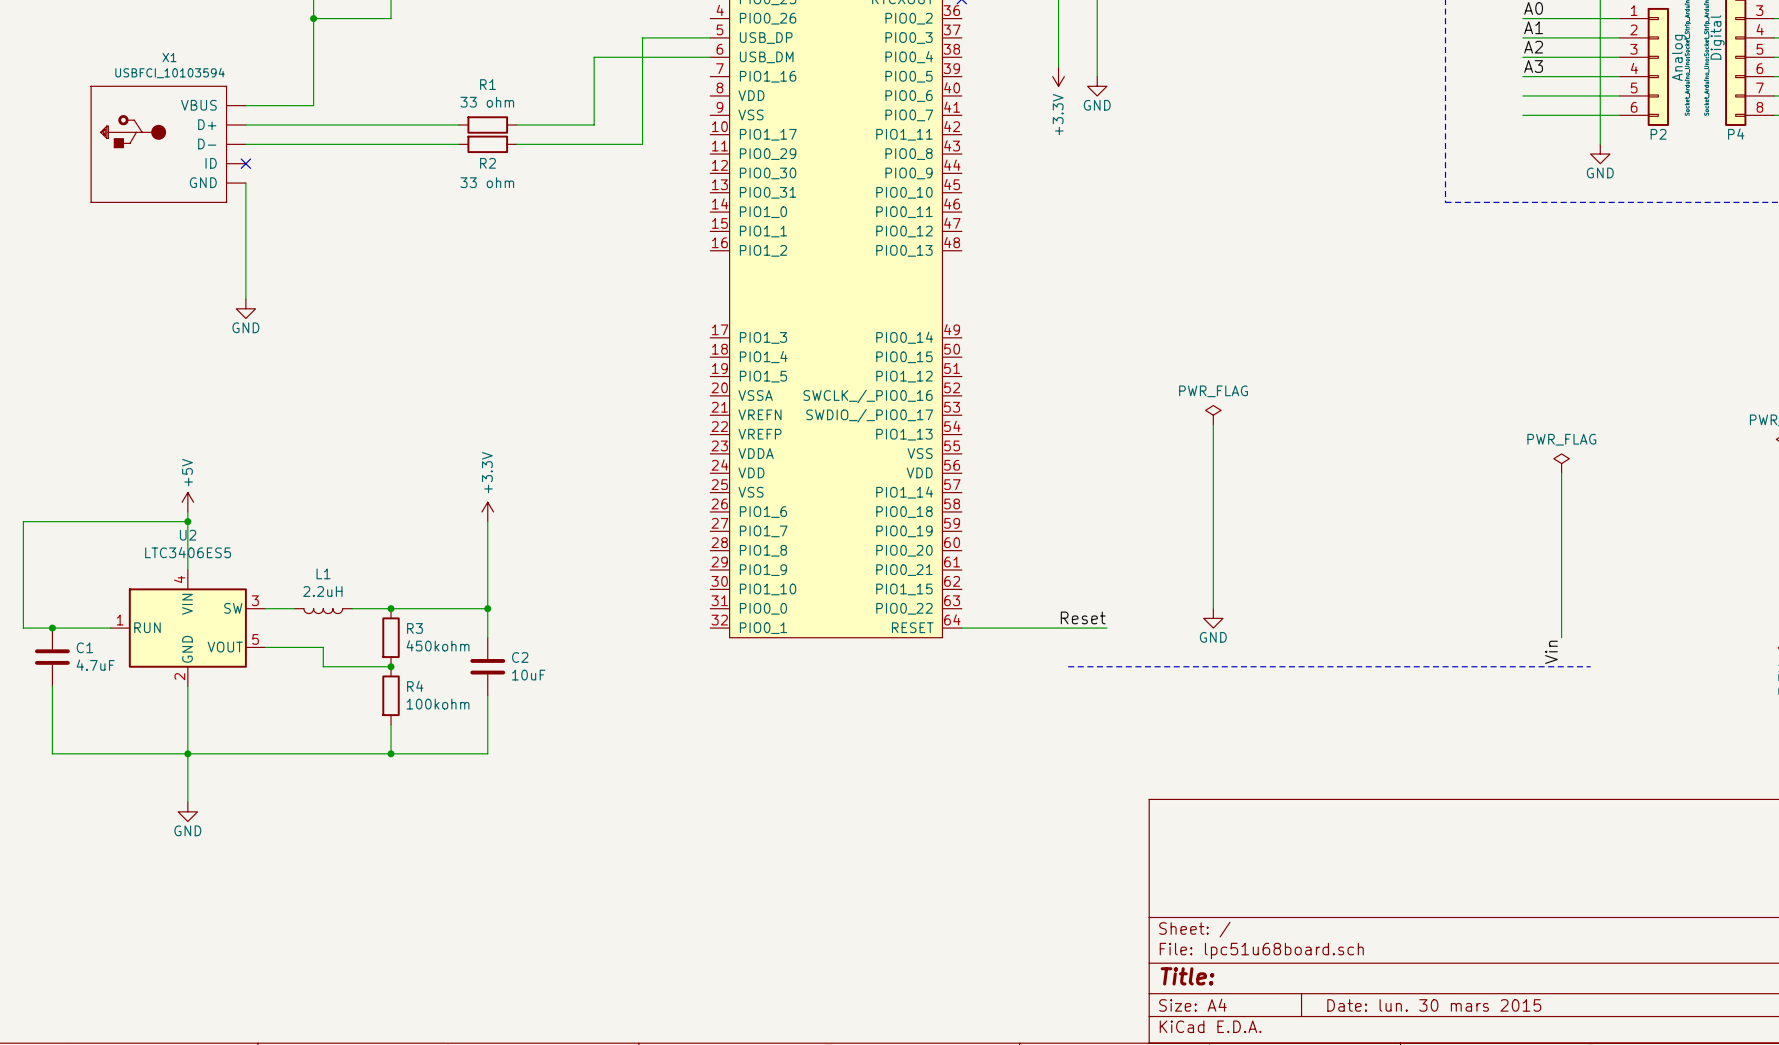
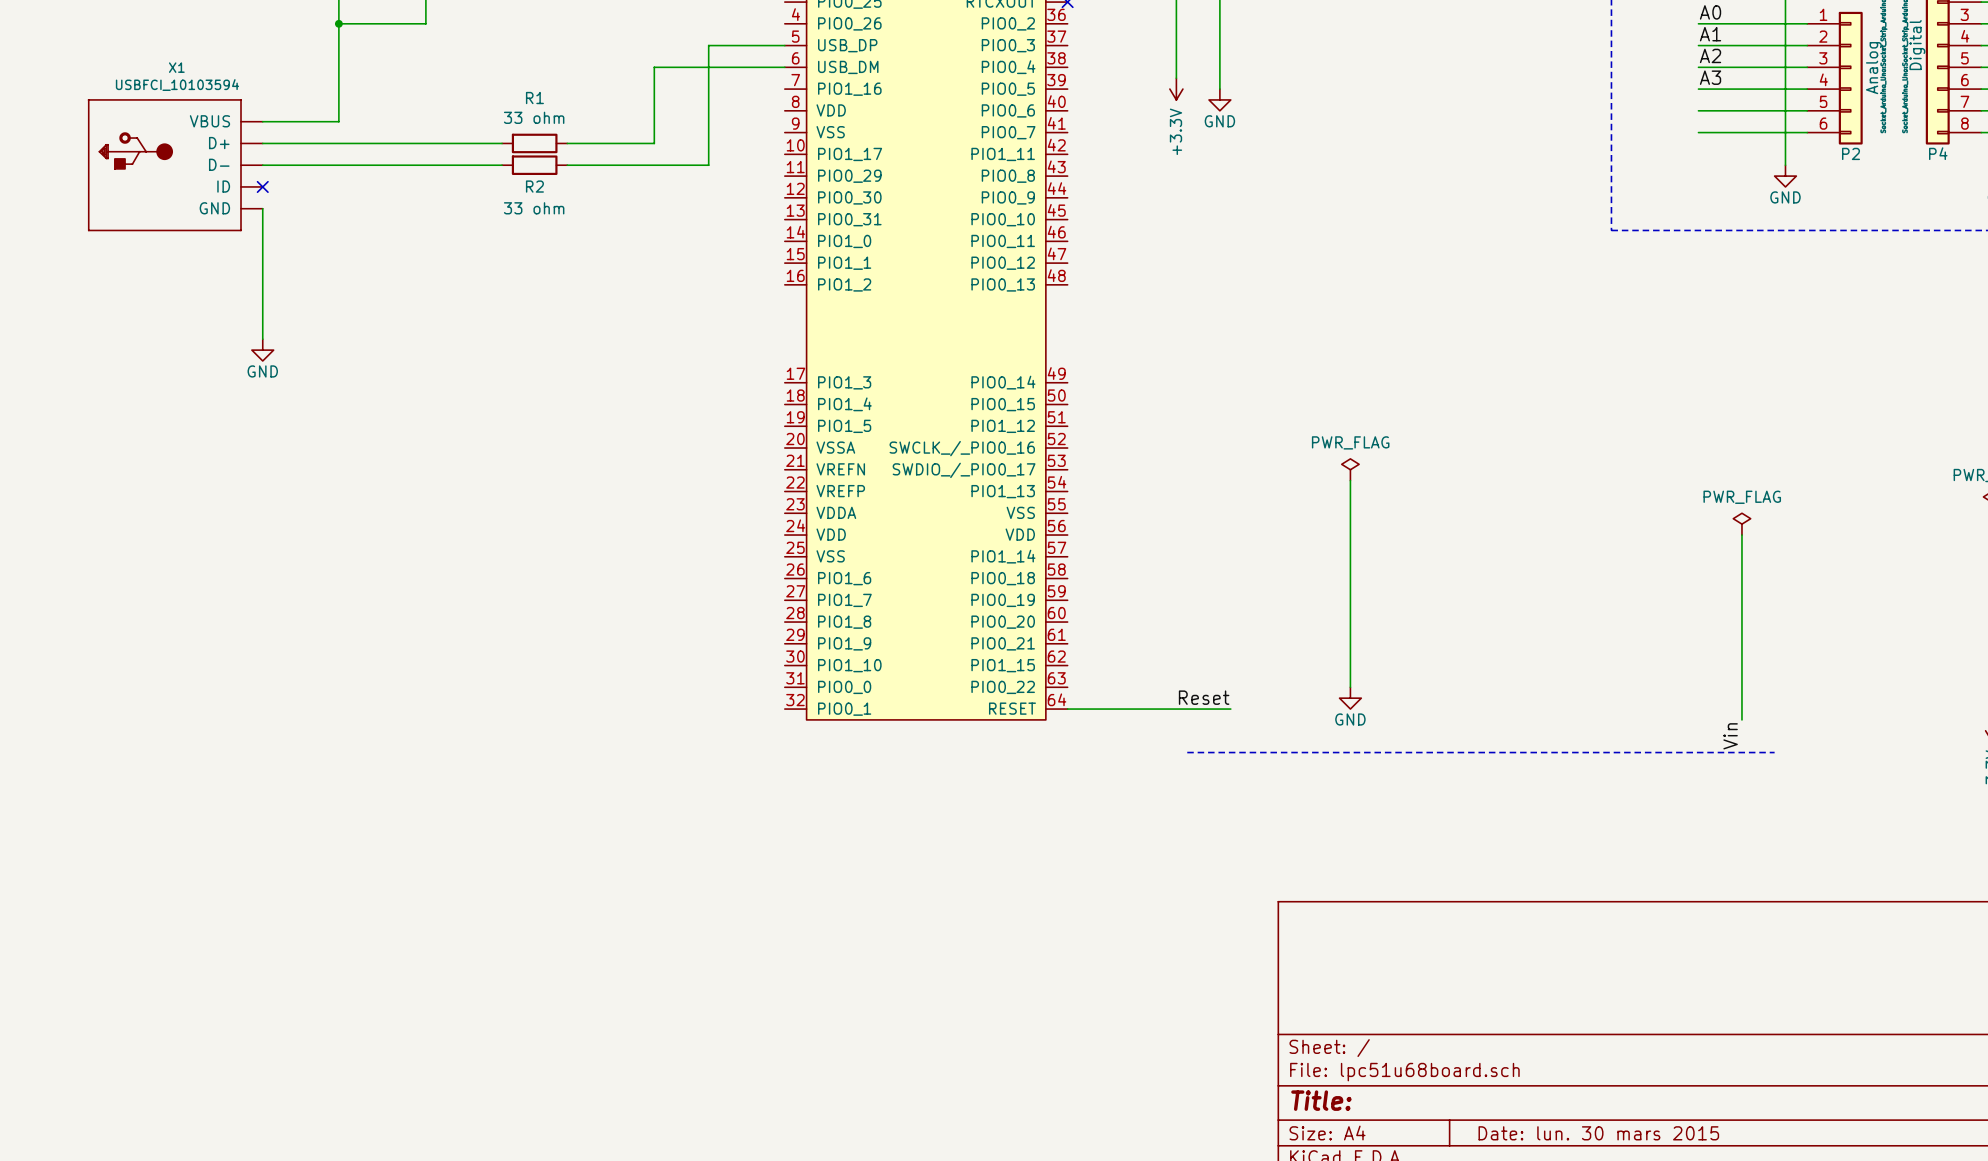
power symbol: +5V (187, 502) -> none
wire: (187, 511) (187, 570) -> none
power symbol: +3.3V (487, 511) -> none
wire: (187, 521) (23, 521) (23, 628) (110, 628) -> none
junction: (187, 521) -> none
wire: (487, 521) (487, 637) -> none
wire: (265, 608) (294, 608) -> none
wire: (352, 608) (487, 608) -> none
junction: (391, 608) -> none
junction: (487, 608) -> none
L1: 2.2uH (323, 611) -> none
junction: (52, 628) -> none
U2: LTC3406ES5 (187, 628) -> none
R3: 450kohm (391, 637) -> none
wire: (265, 647) (323, 647) (323, 666) (391, 666) -> none
C1: 4.7uF (52, 657) -> none
junction: (391, 666) -> none
C2: 10uF (487, 666) -> none
wire: (52, 686) (52, 753) (487, 753) (487, 695) -> none
wire: (187, 686) (187, 802) -> none
R4: 100kohm (391, 695) -> none
wire: (391, 724) (391, 753) -> none
junction: (187, 753) -> none
junction: (391, 753) -> none
power symbol: GND (187, 811) -> none

